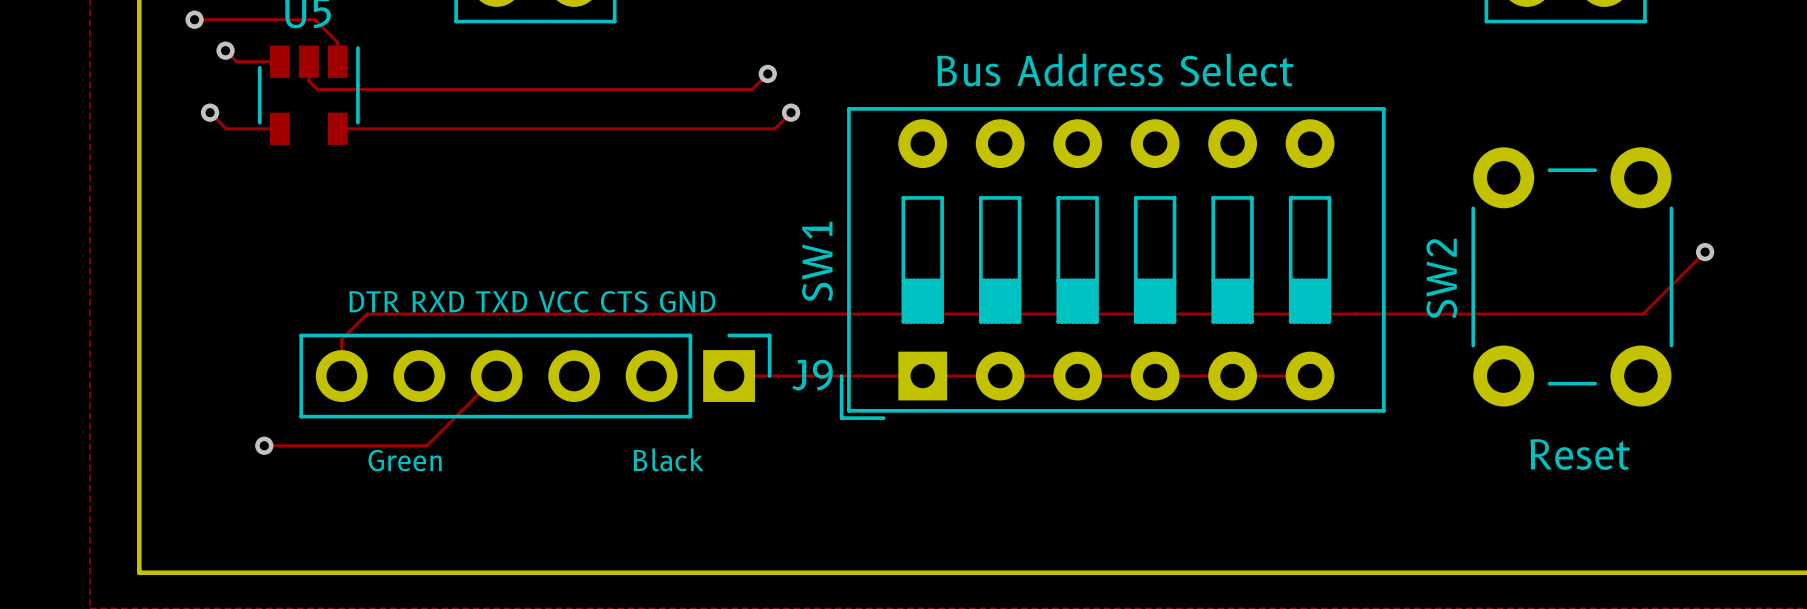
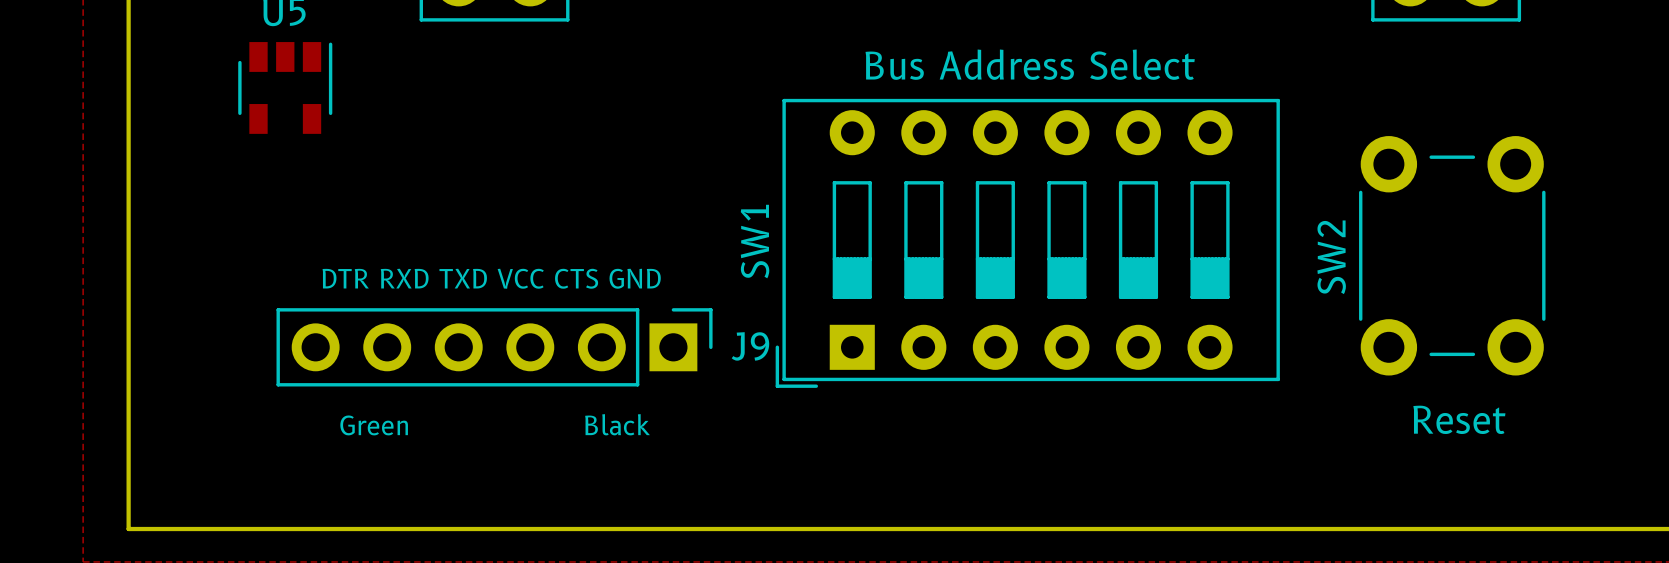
track: (194, 19) (315, 19) (337, 42) (337, 61) -> none
via: (194, 19) -> none
track: (225, 50) (236, 61) (279, 61) -> none
via: (225, 50) -> none
track: (308, 61) (308, 80) (317, 89) (752, 89) (767, 73) -> none
via: (767, 73) -> none
track: (210, 112) (226, 128) (279, 128) -> none
via: (210, 112) -> none
track: (791, 112) (774, 128) (337, 128) -> none
via: (791, 112) -> none
track: (1705, 252) (1643, 314) (367, 314) (341, 339) (341, 376) -> none
via: (1705, 252) -> none
track: (496, 376) (426, 445) (264, 445) -> none
track: (729, 376) (1310, 376) -> none
via: (264, 445) -> none

